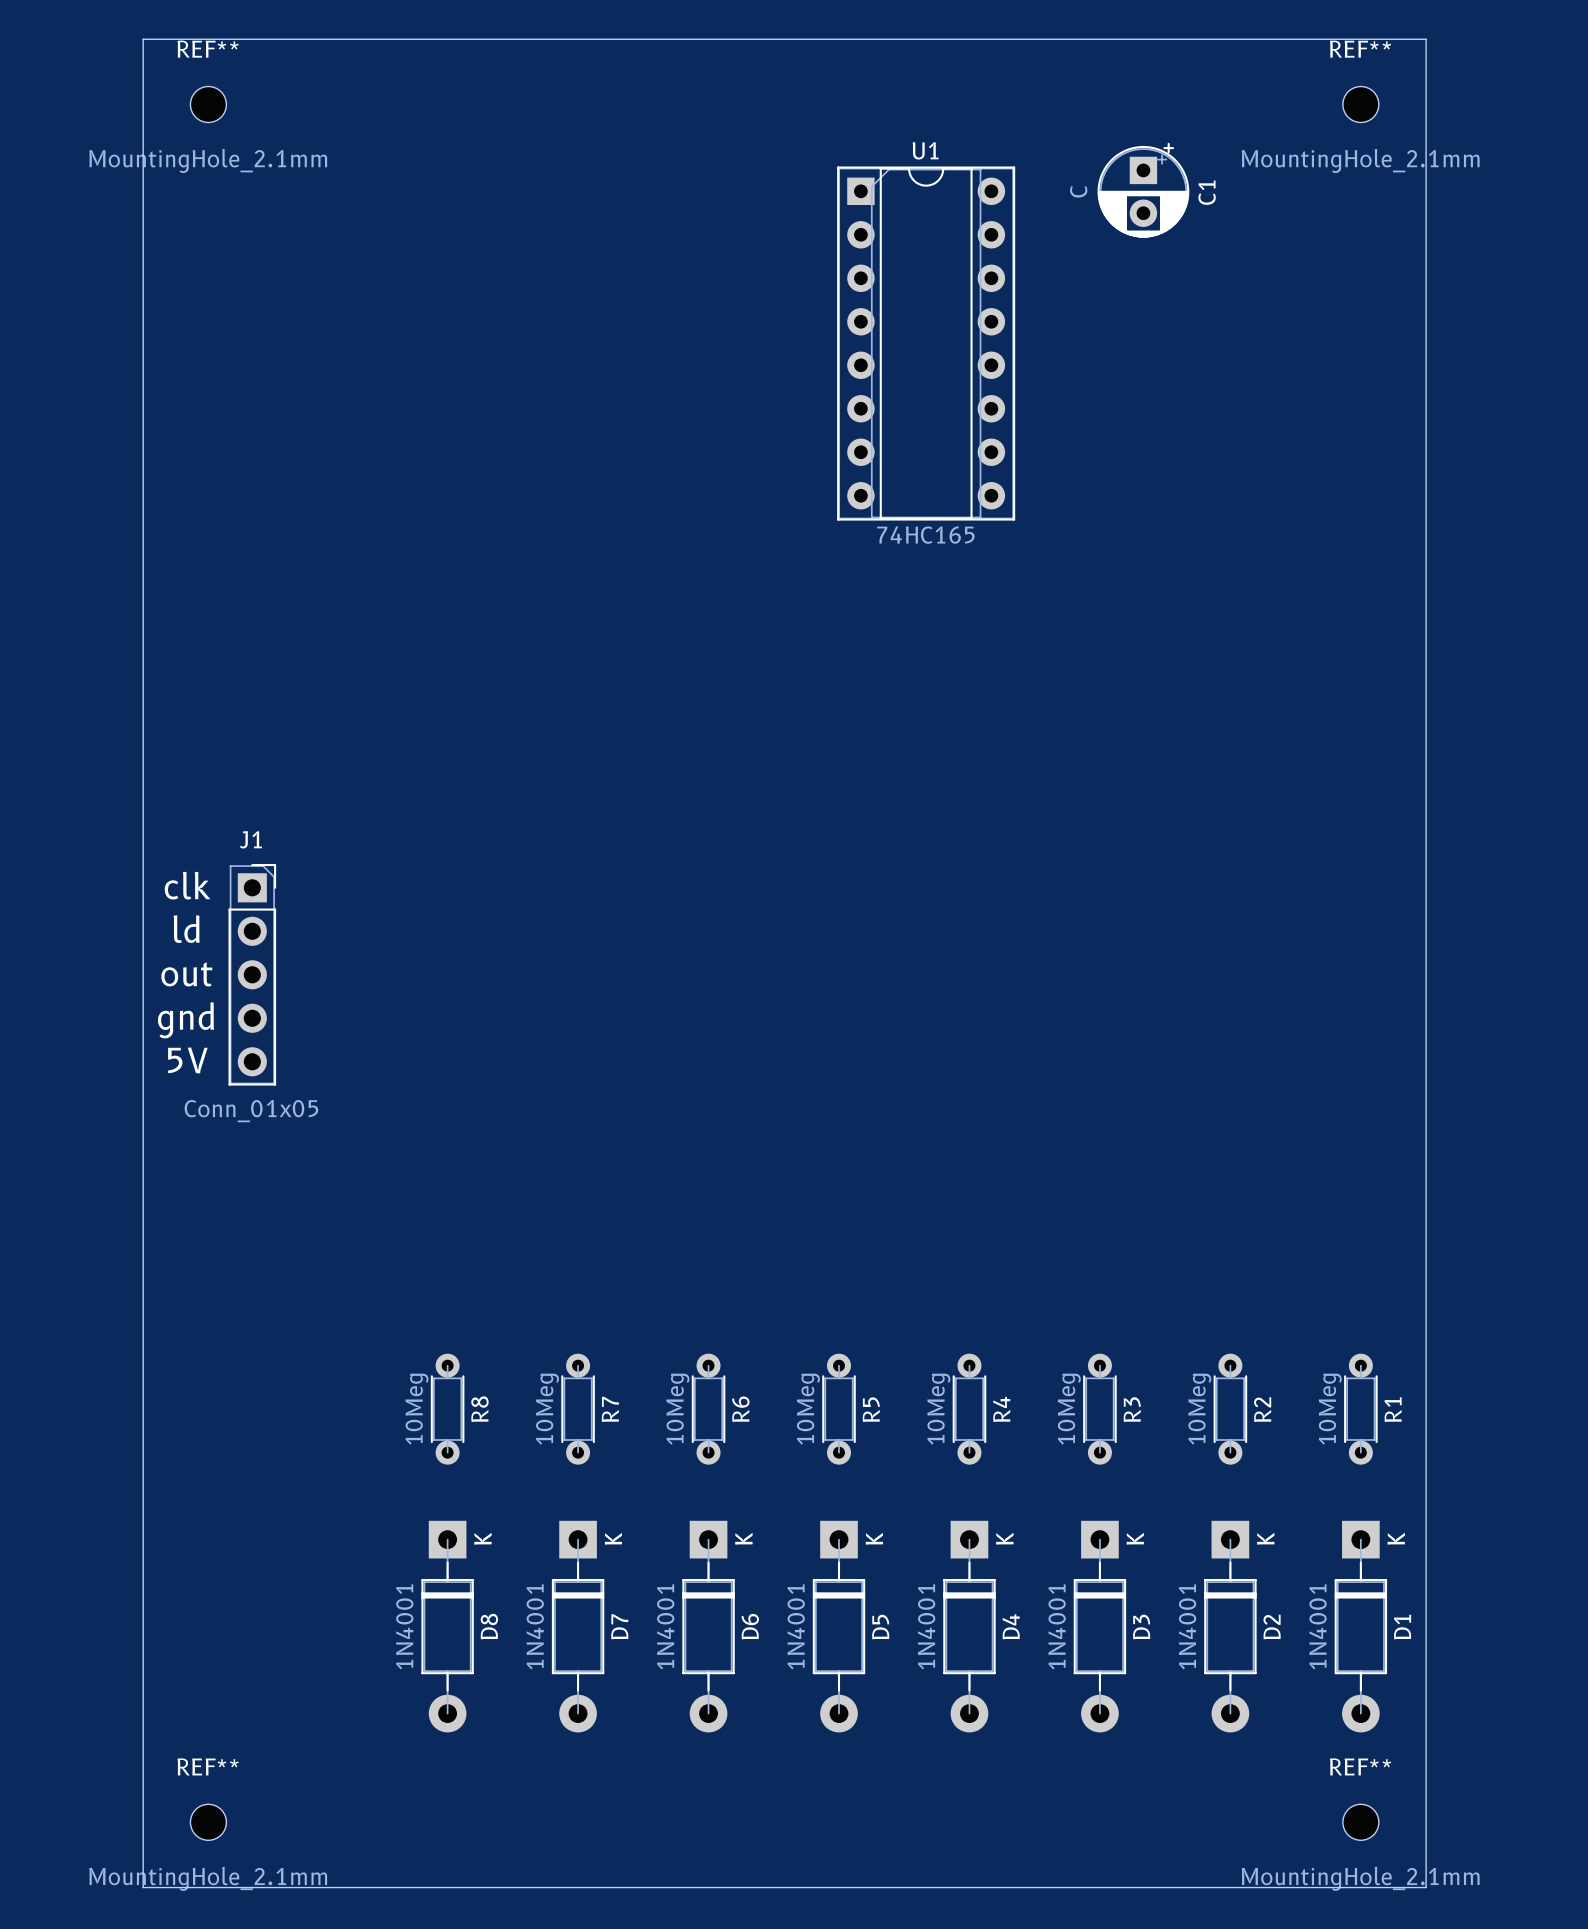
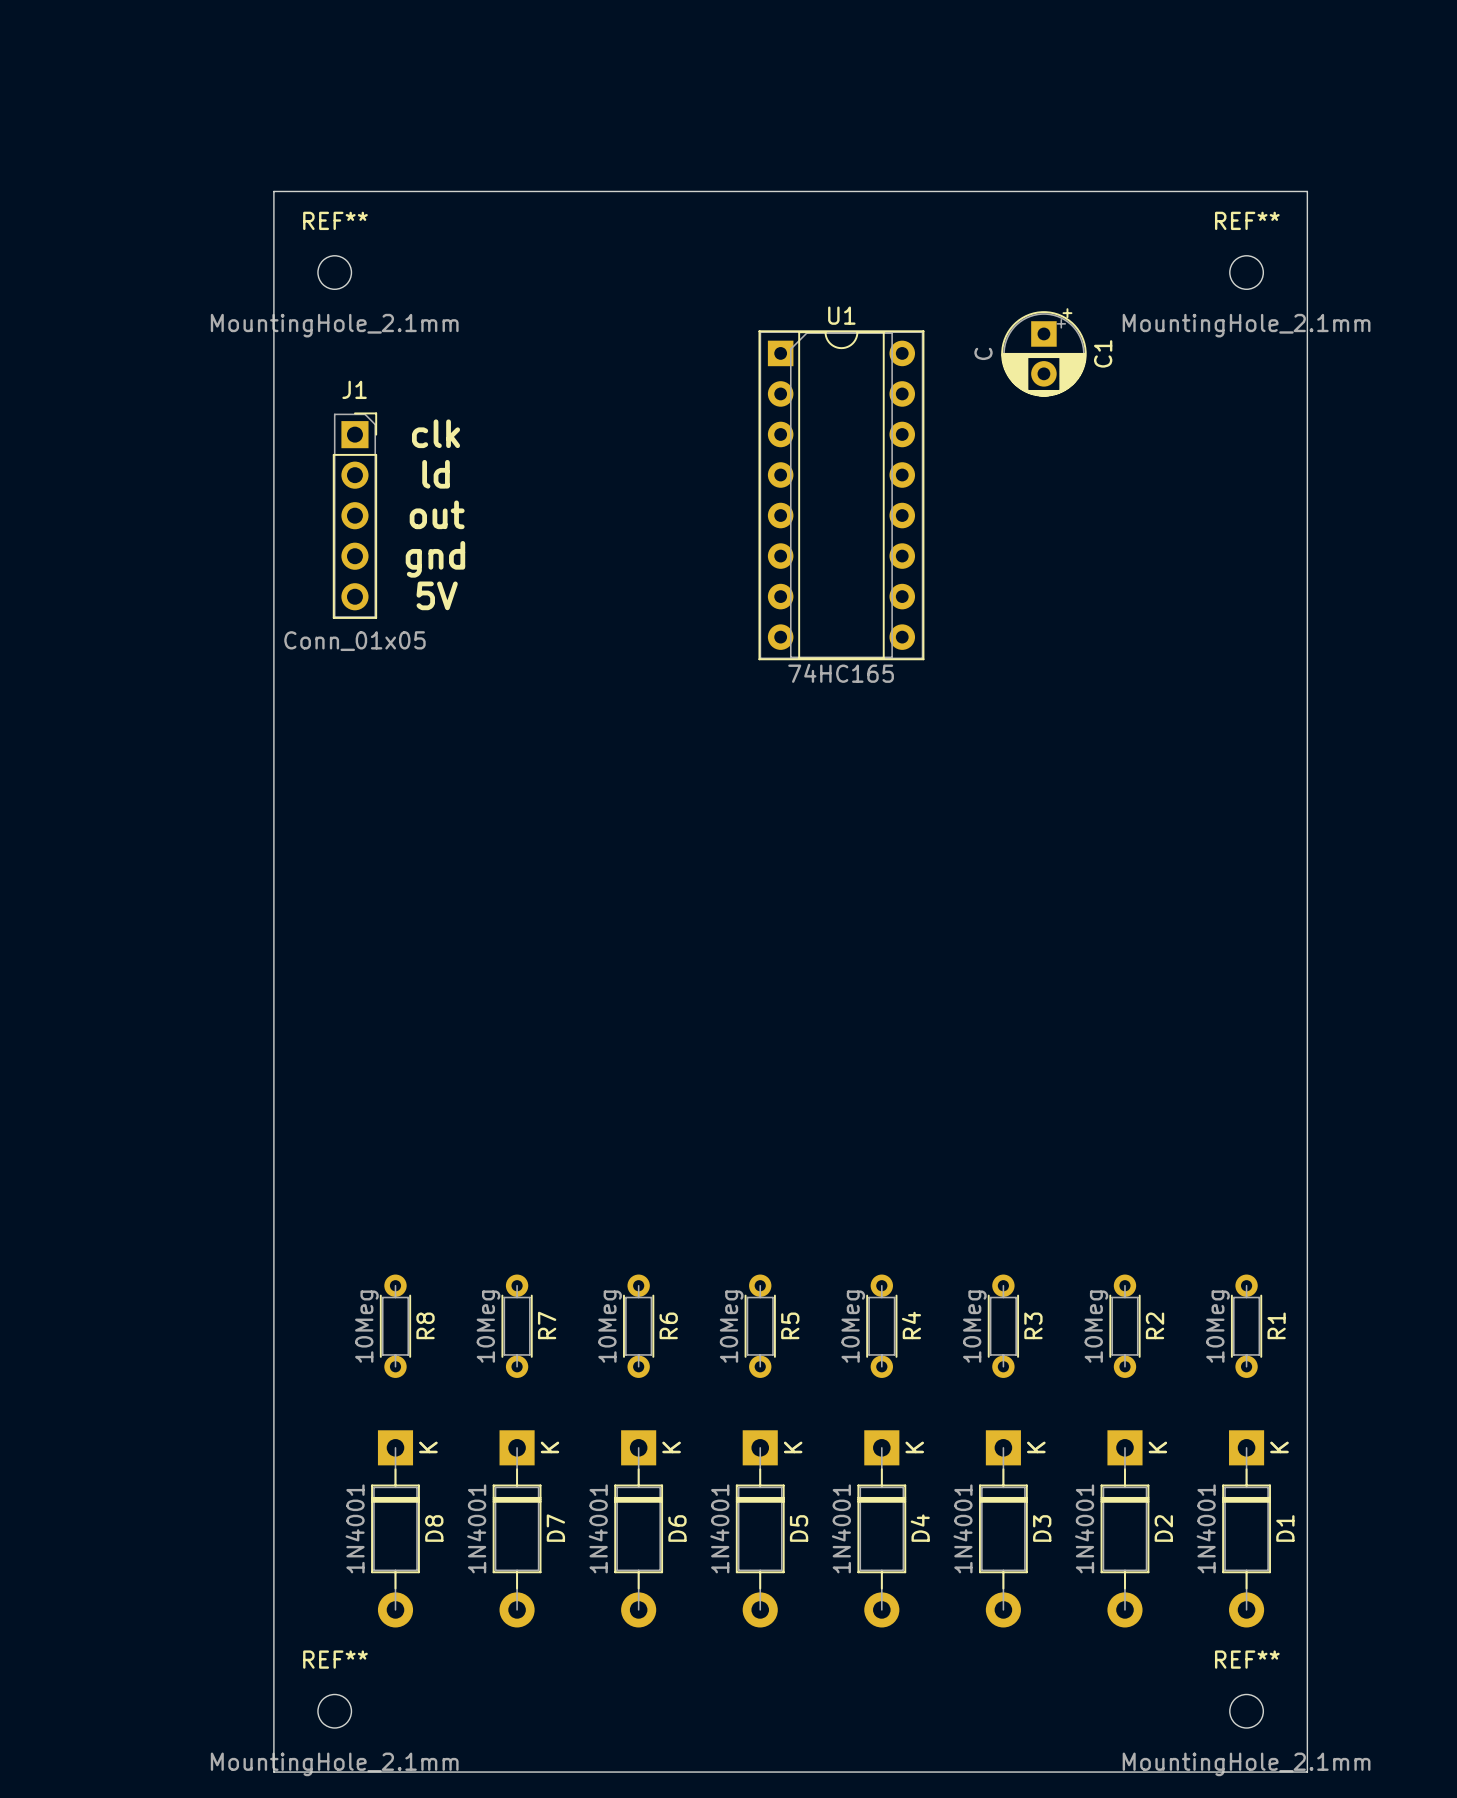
REF** position: (208, 104) -> (334, 272)
REF** position: (1360, 104) -> (1246, 272)
C1 position: (1143, 190) -> (1043, 352)
board edge: (1426, 191) (1426, 39) (143, 39) (143, 1887) (317, 1887) -> (1307, 191) (273, 191) (273, 1772)
U1 position: (926, 343) -> (841, 495)
text: none -> clk (436, 433)
text: none -> ld (436, 474)
text: none -> out (437, 514)
text: none -> gnd (435, 559)
text: none -> 5V (437, 595)
text: clk (187, 885) -> none
text: ld (186, 929) -> none
text: out (186, 974) -> none
J1 position: (252, 974) -> (354, 515)
text: gnd (185, 1020) -> none
text: 5V (187, 1060) -> none
REF** position: (208, 1822) -> (334, 1711)

